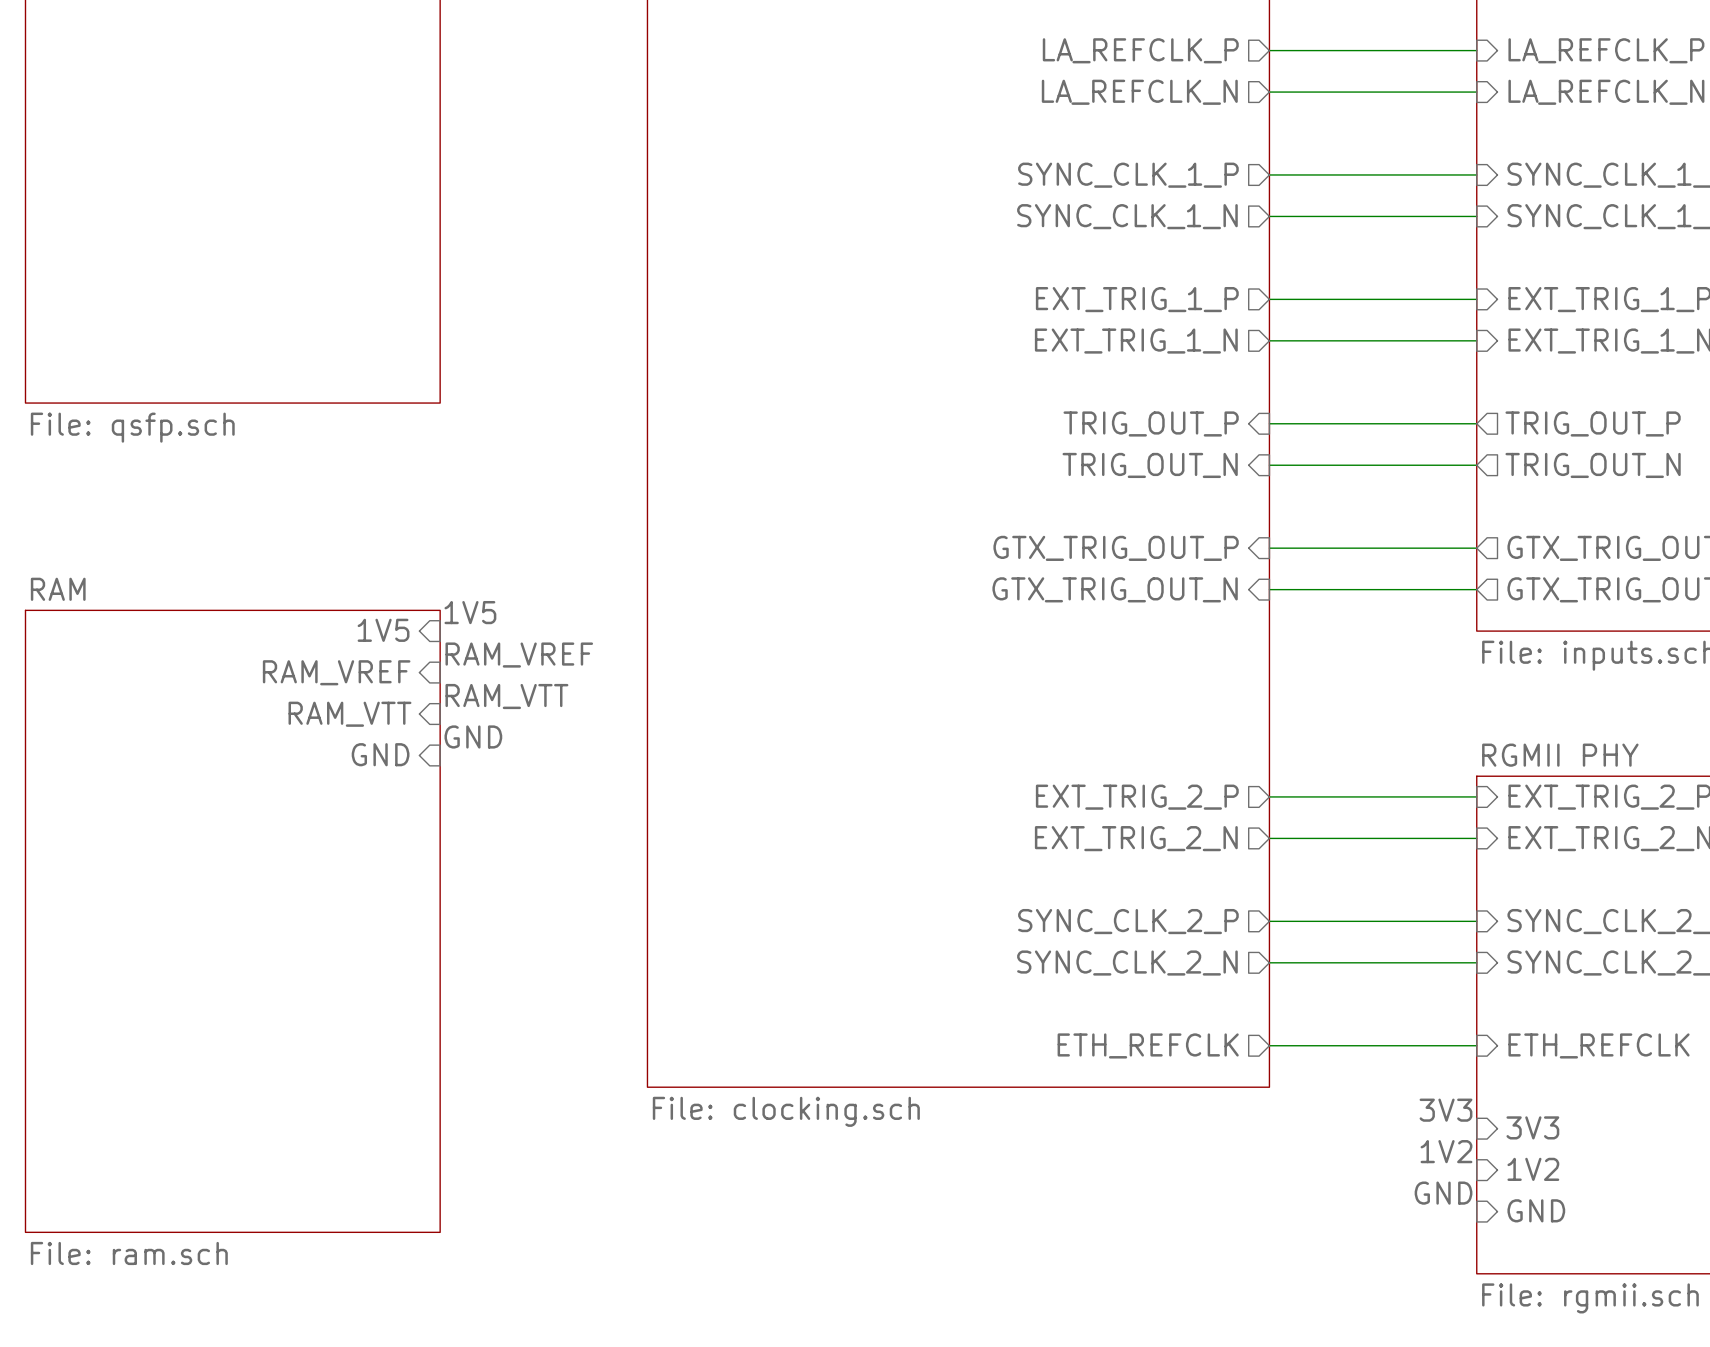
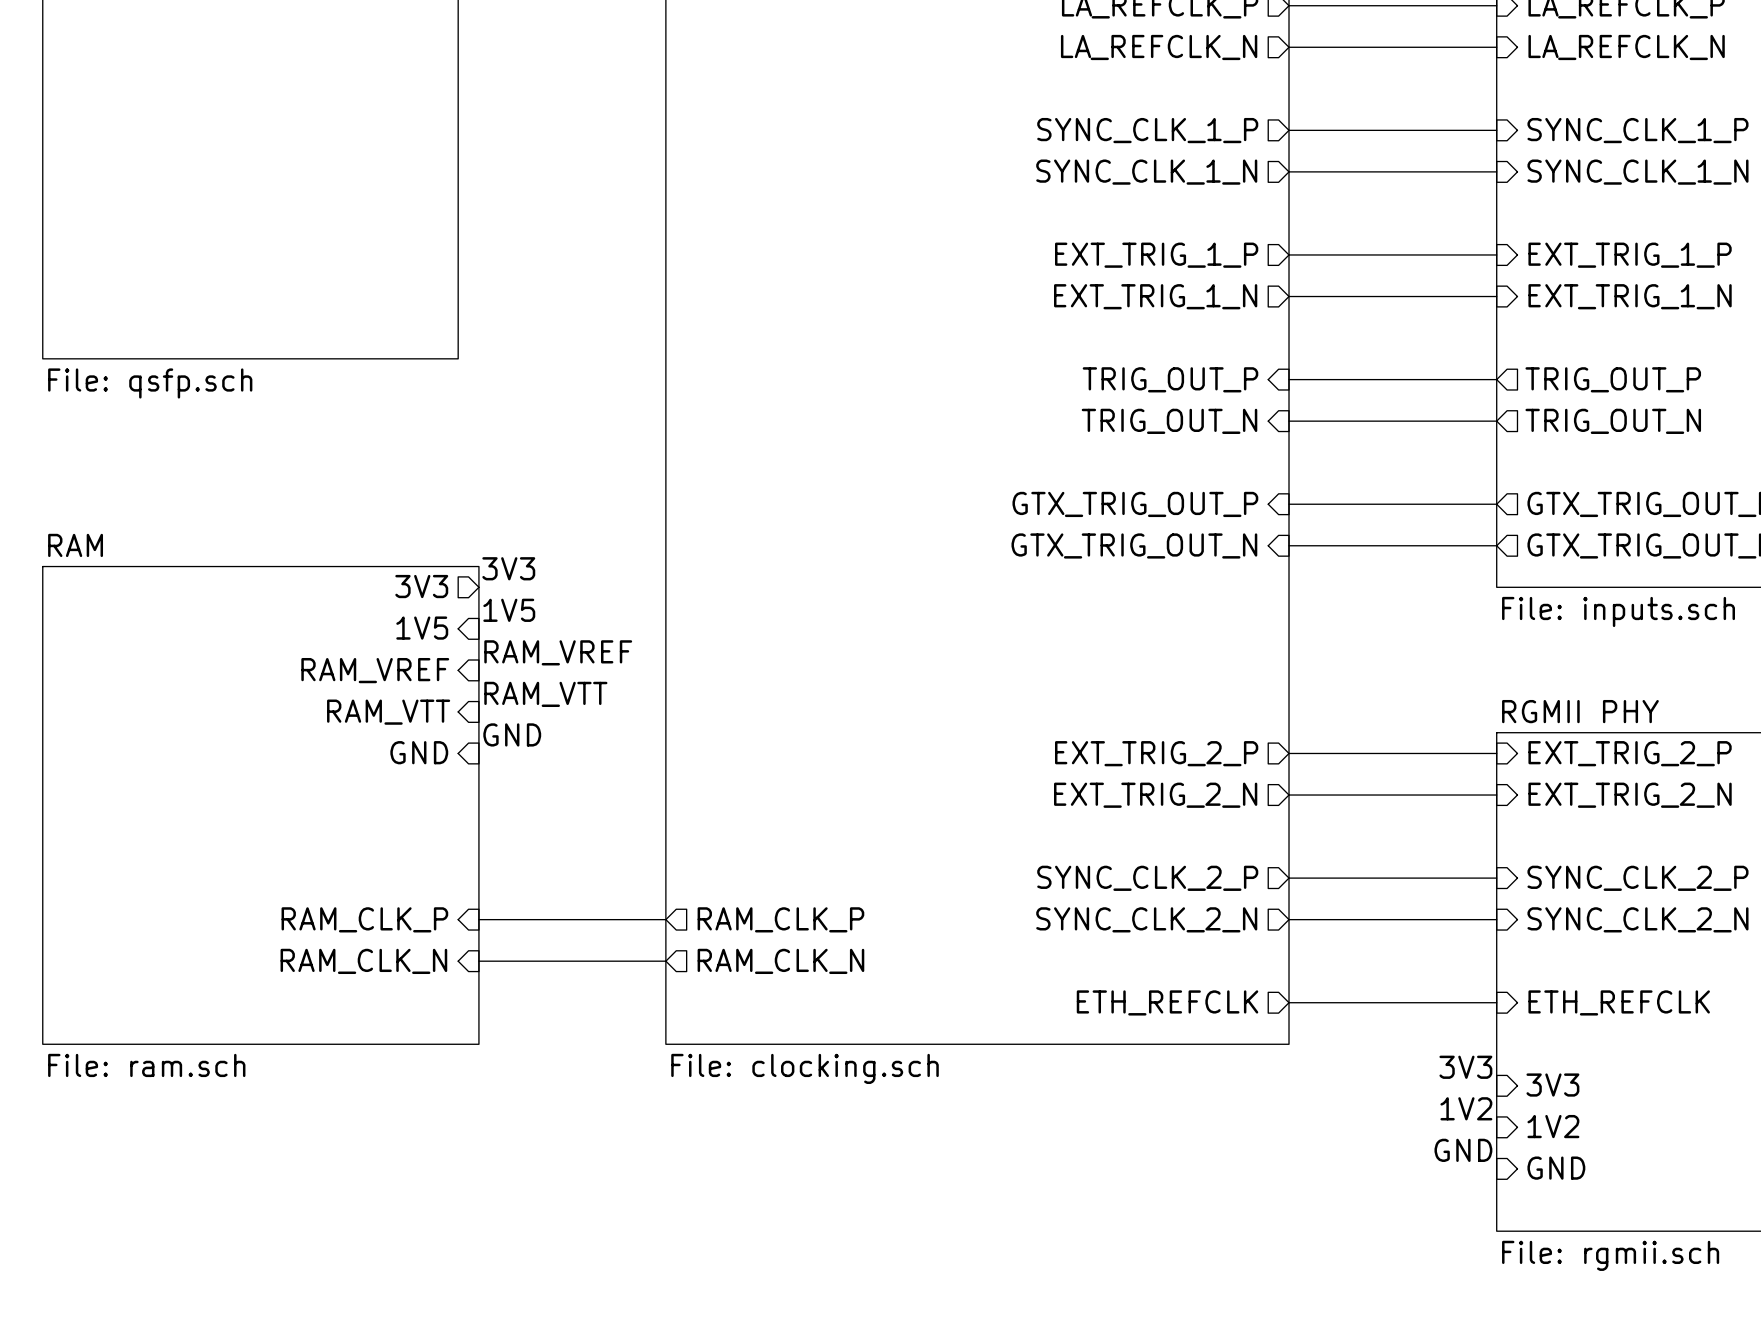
label position: 1V5 (470, 612) -> 1V5 (509, 610)
label: none -> 3V3 (508, 568)
sheet pin position: 1V5 (383, 630) -> 1V5 (422, 628)
sheet pin: none -> 3V3 (421, 586)
label position: RAM_VREF (519, 655) -> RAM_VREF (558, 652)
sheet pin position: RAM_VREF (336, 672) -> RAM_VREF (375, 670)
label position: RAM_VTT (506, 696) -> RAM_VTT (545, 694)
sheet pin position: RAM_VTT (349, 714) -> RAM_VTT (388, 712)
label position: GND (473, 736) -> GND (512, 734)
sheet pin position: GND (380, 754) -> GND (419, 752)
sheet RAM: none -> File: ram.sch (260, 805)
sheet RAM: File: ram.sch (232, 921) -> none
wire: none -> (478, 919) (665, 919)
sheet pin: none -> RAM_CLK_P (364, 919)
sheet pin: none -> RAM_CLK_P (780, 919)
sheet pin: none -> RAM_CLK_N (363, 961)
wire: none -> (478, 961) (665, 961)
sheet pin: none -> RAM_CLK_N (780, 961)

